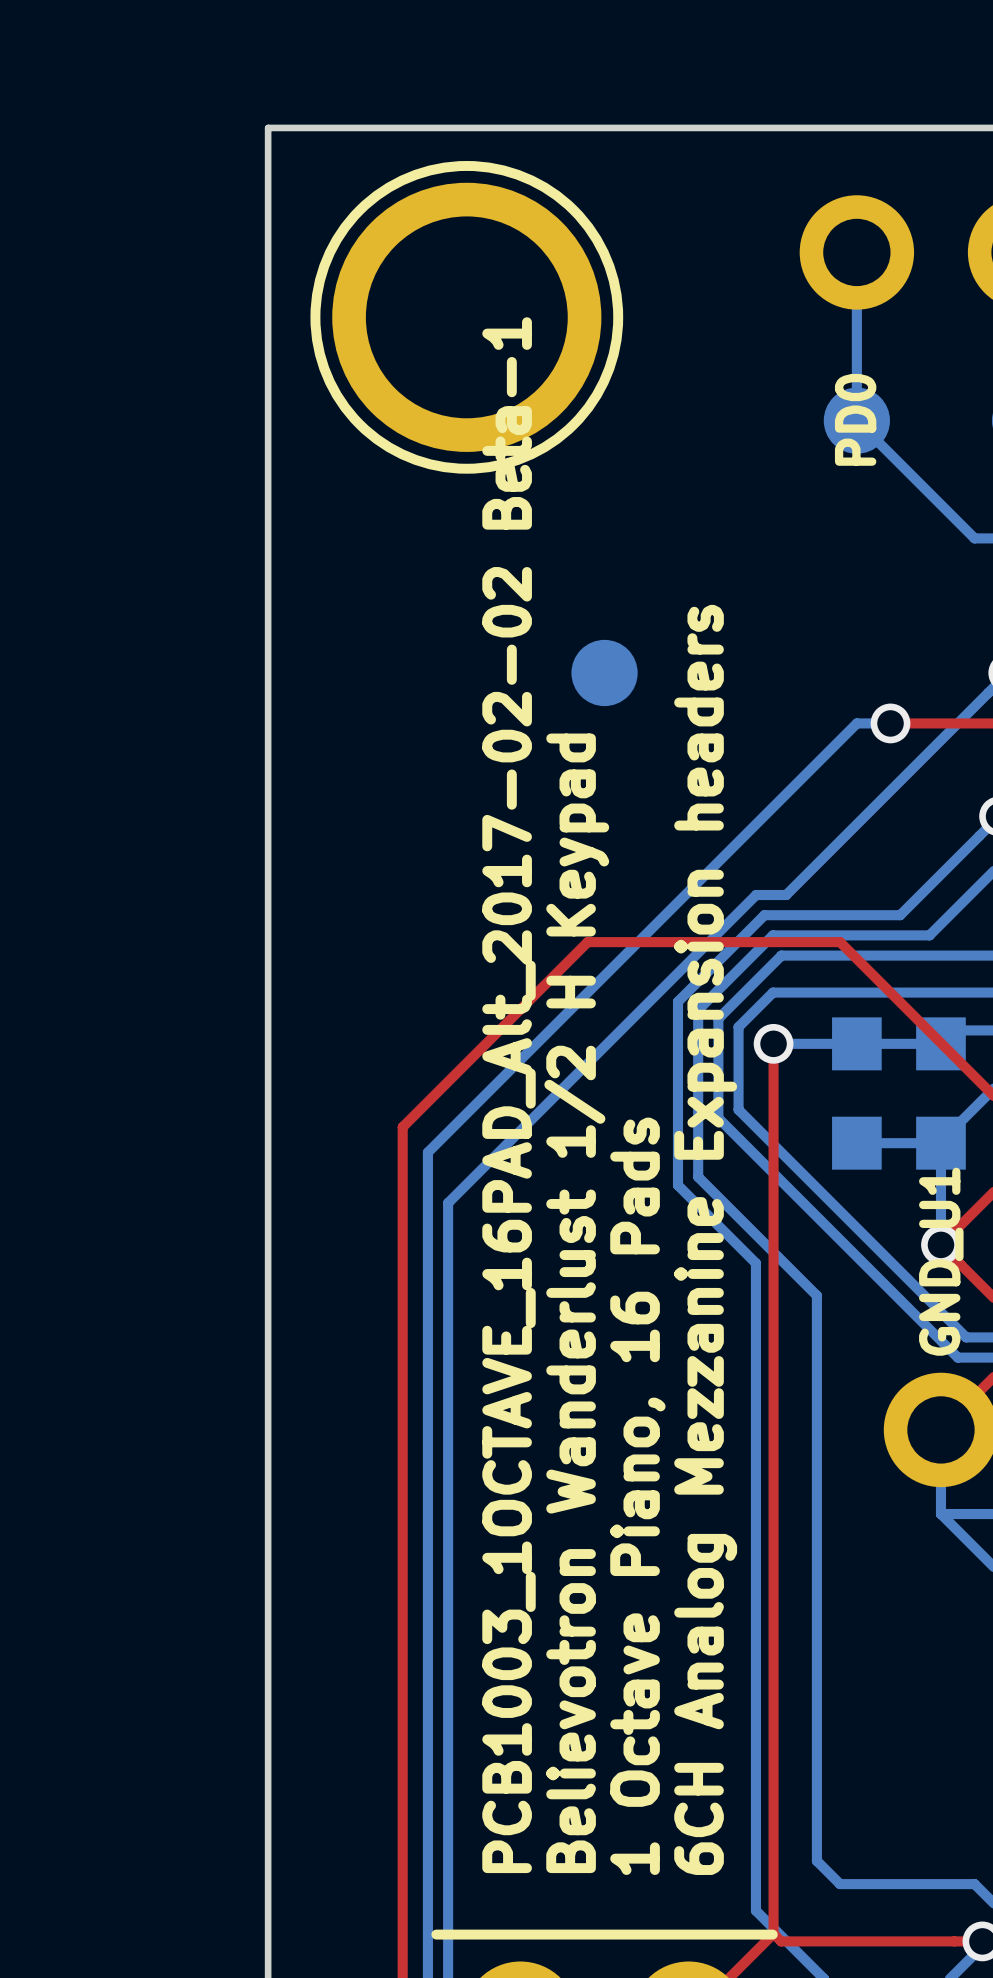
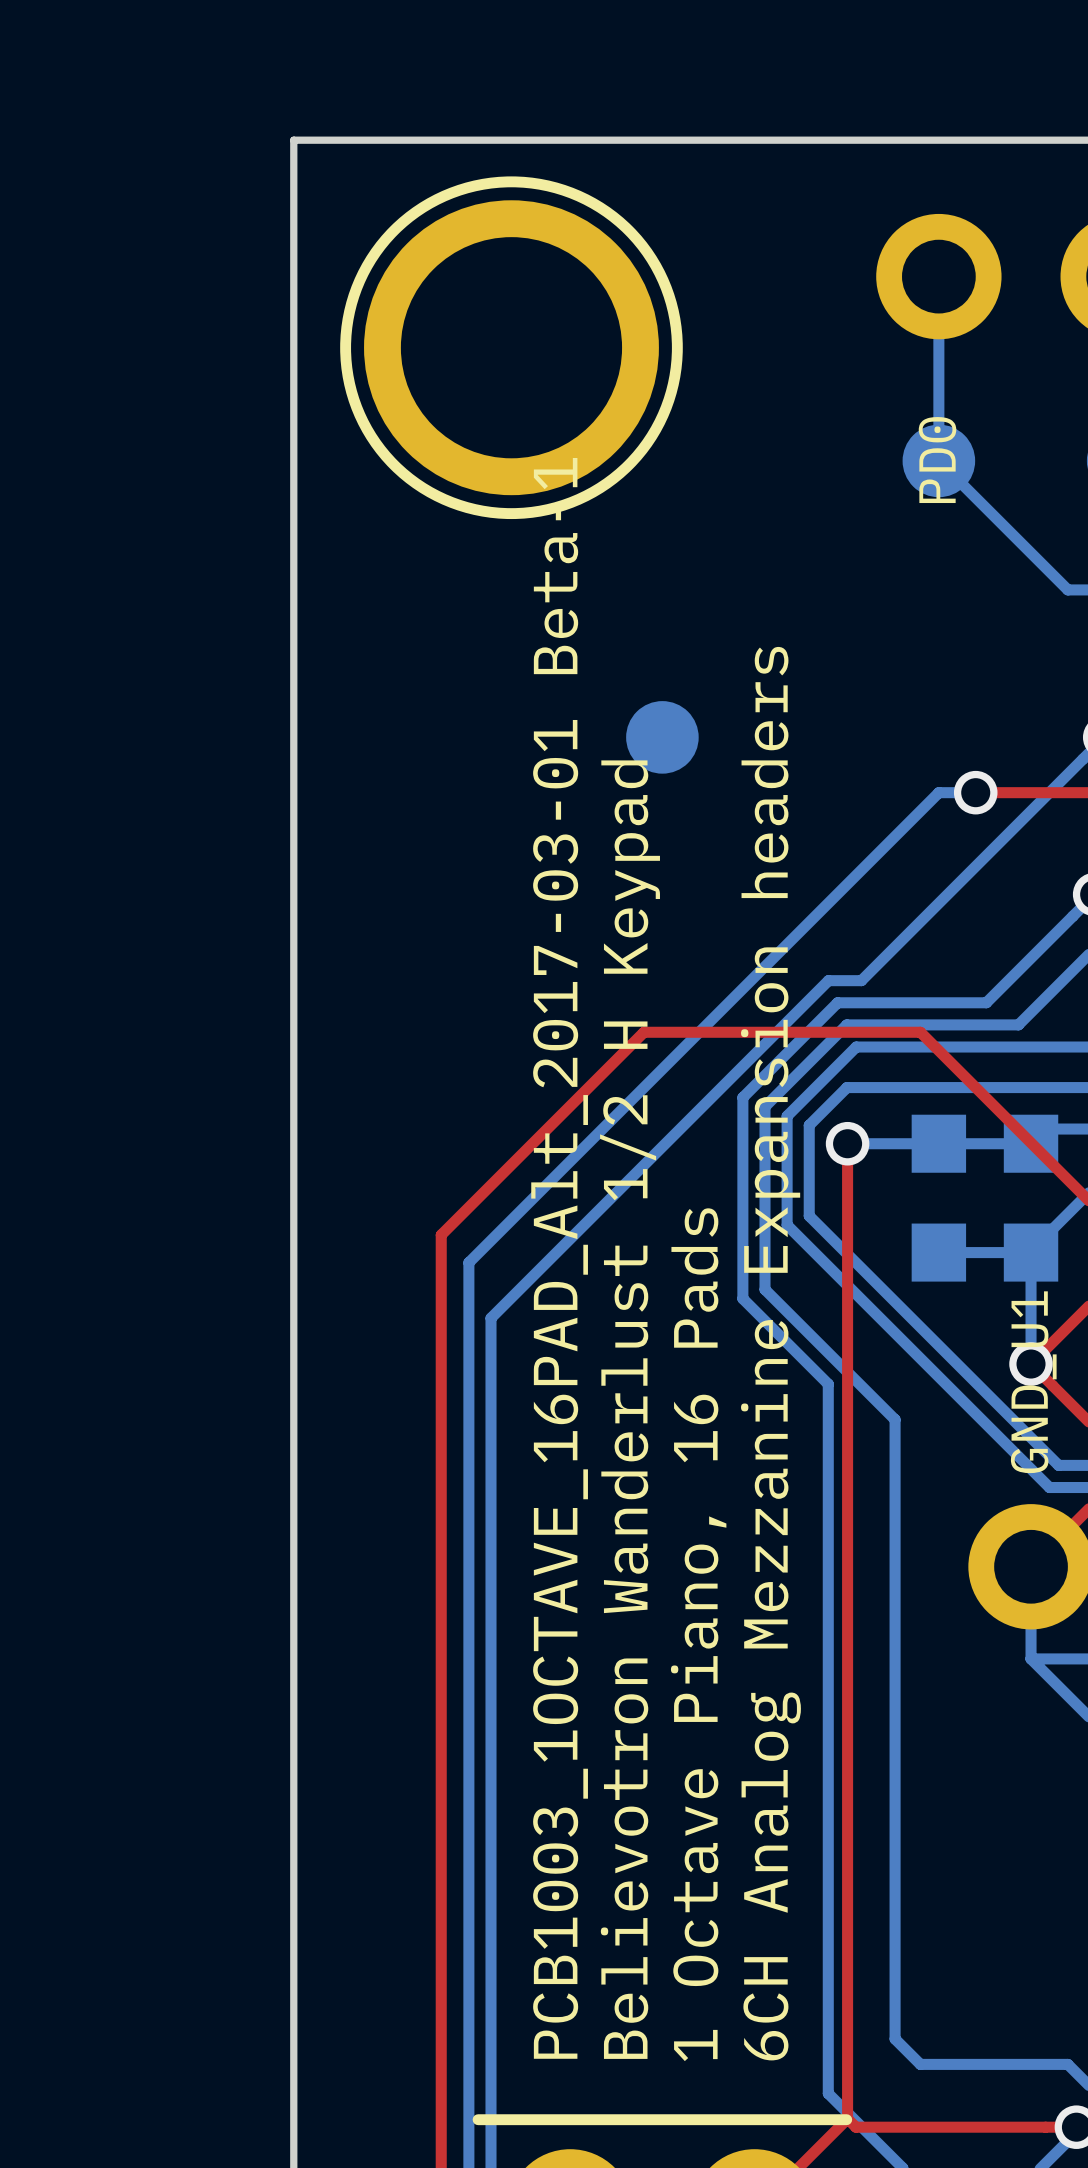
text: PCB1003_1OCTAVE_16PAD_Alt_2017-02-02 Beta-1 (509, 1095) -> PCB1003_1OCTAVE_16PAD_Alt_2017-03-01 Beta-1 (559, 1258)

